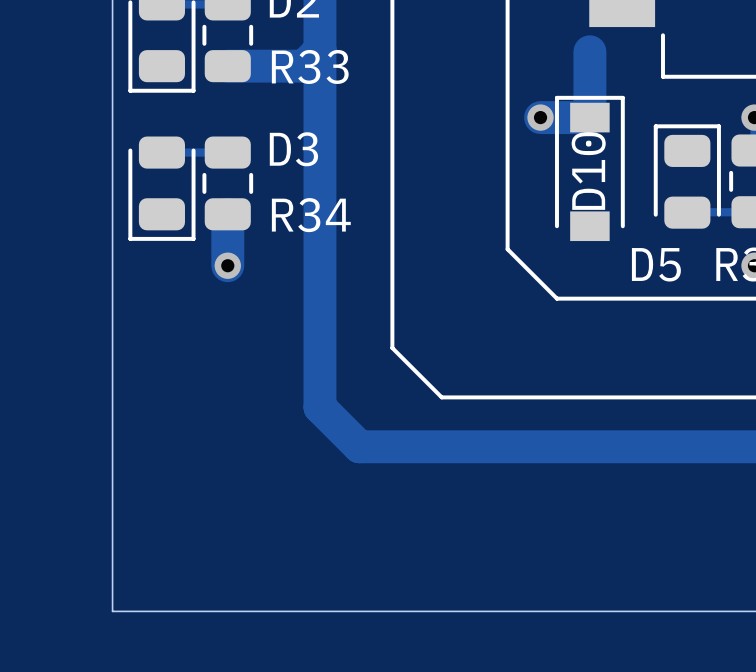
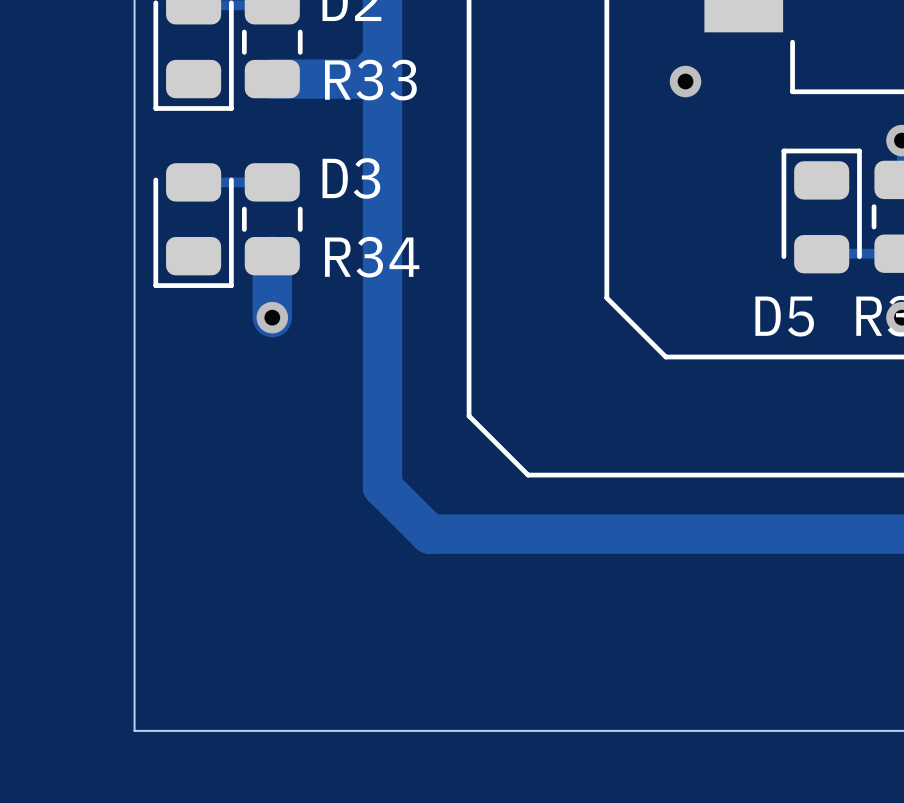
track: (589, 51) (589, 117) (540, 117) -> none
via position: (540, 117) -> (685, 81)
D10: (589, 168) -> none

